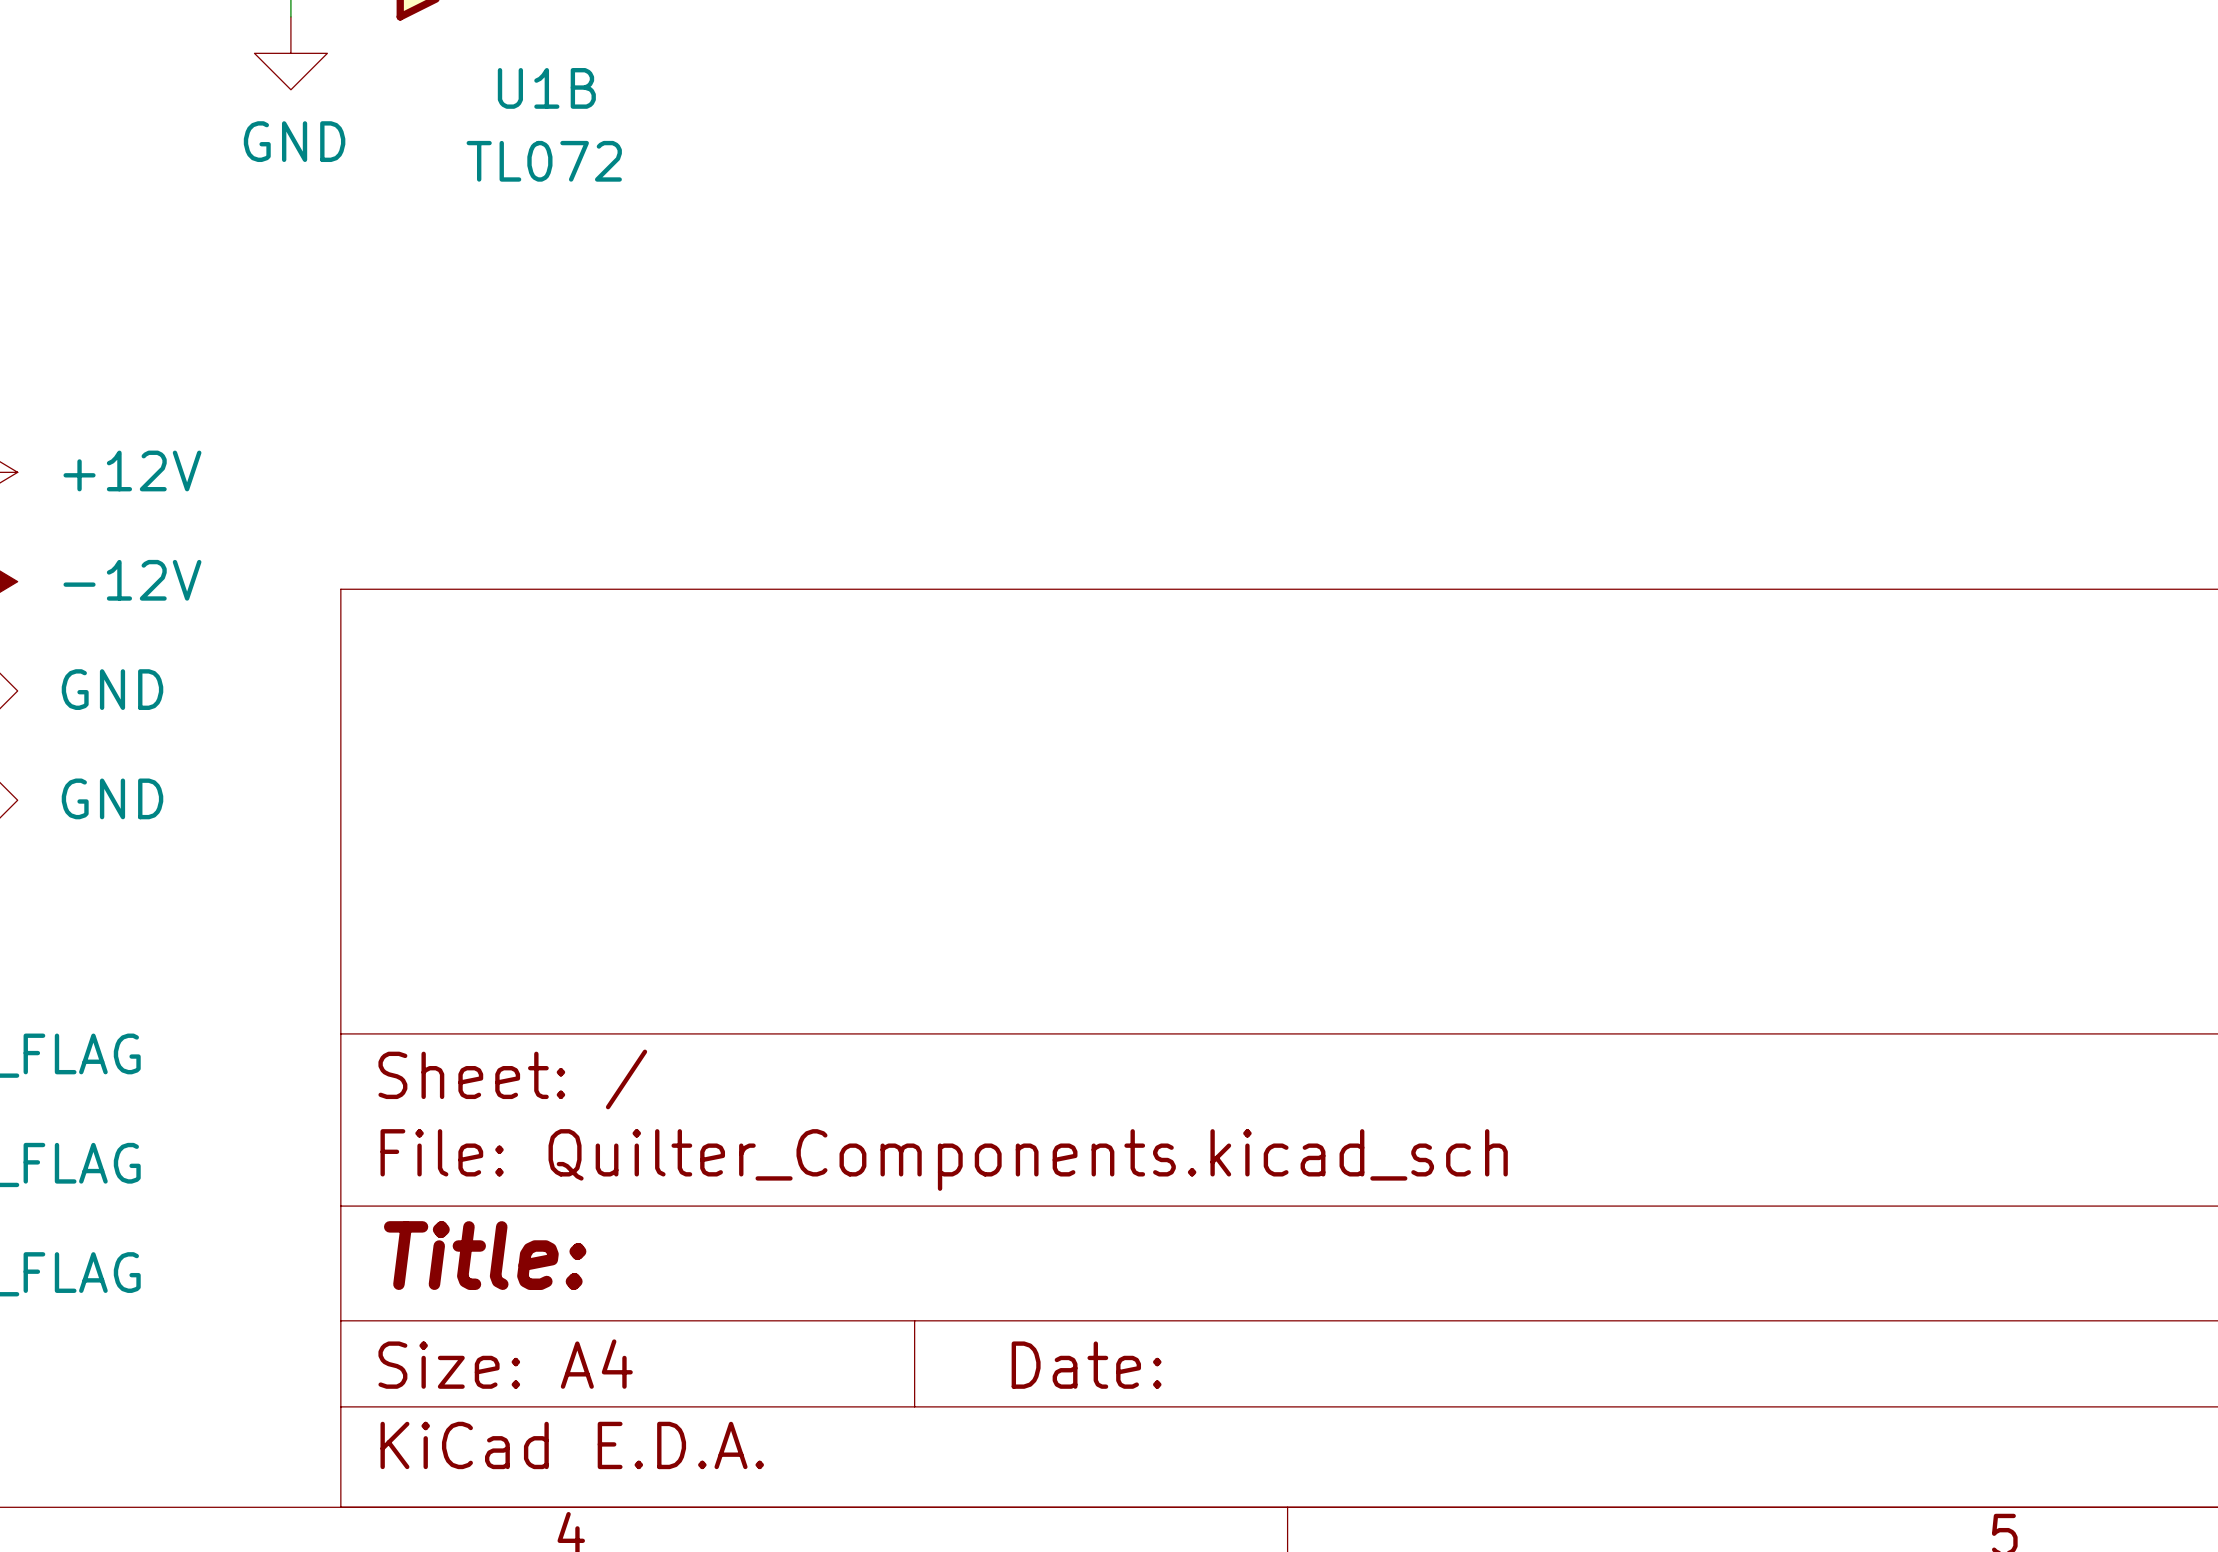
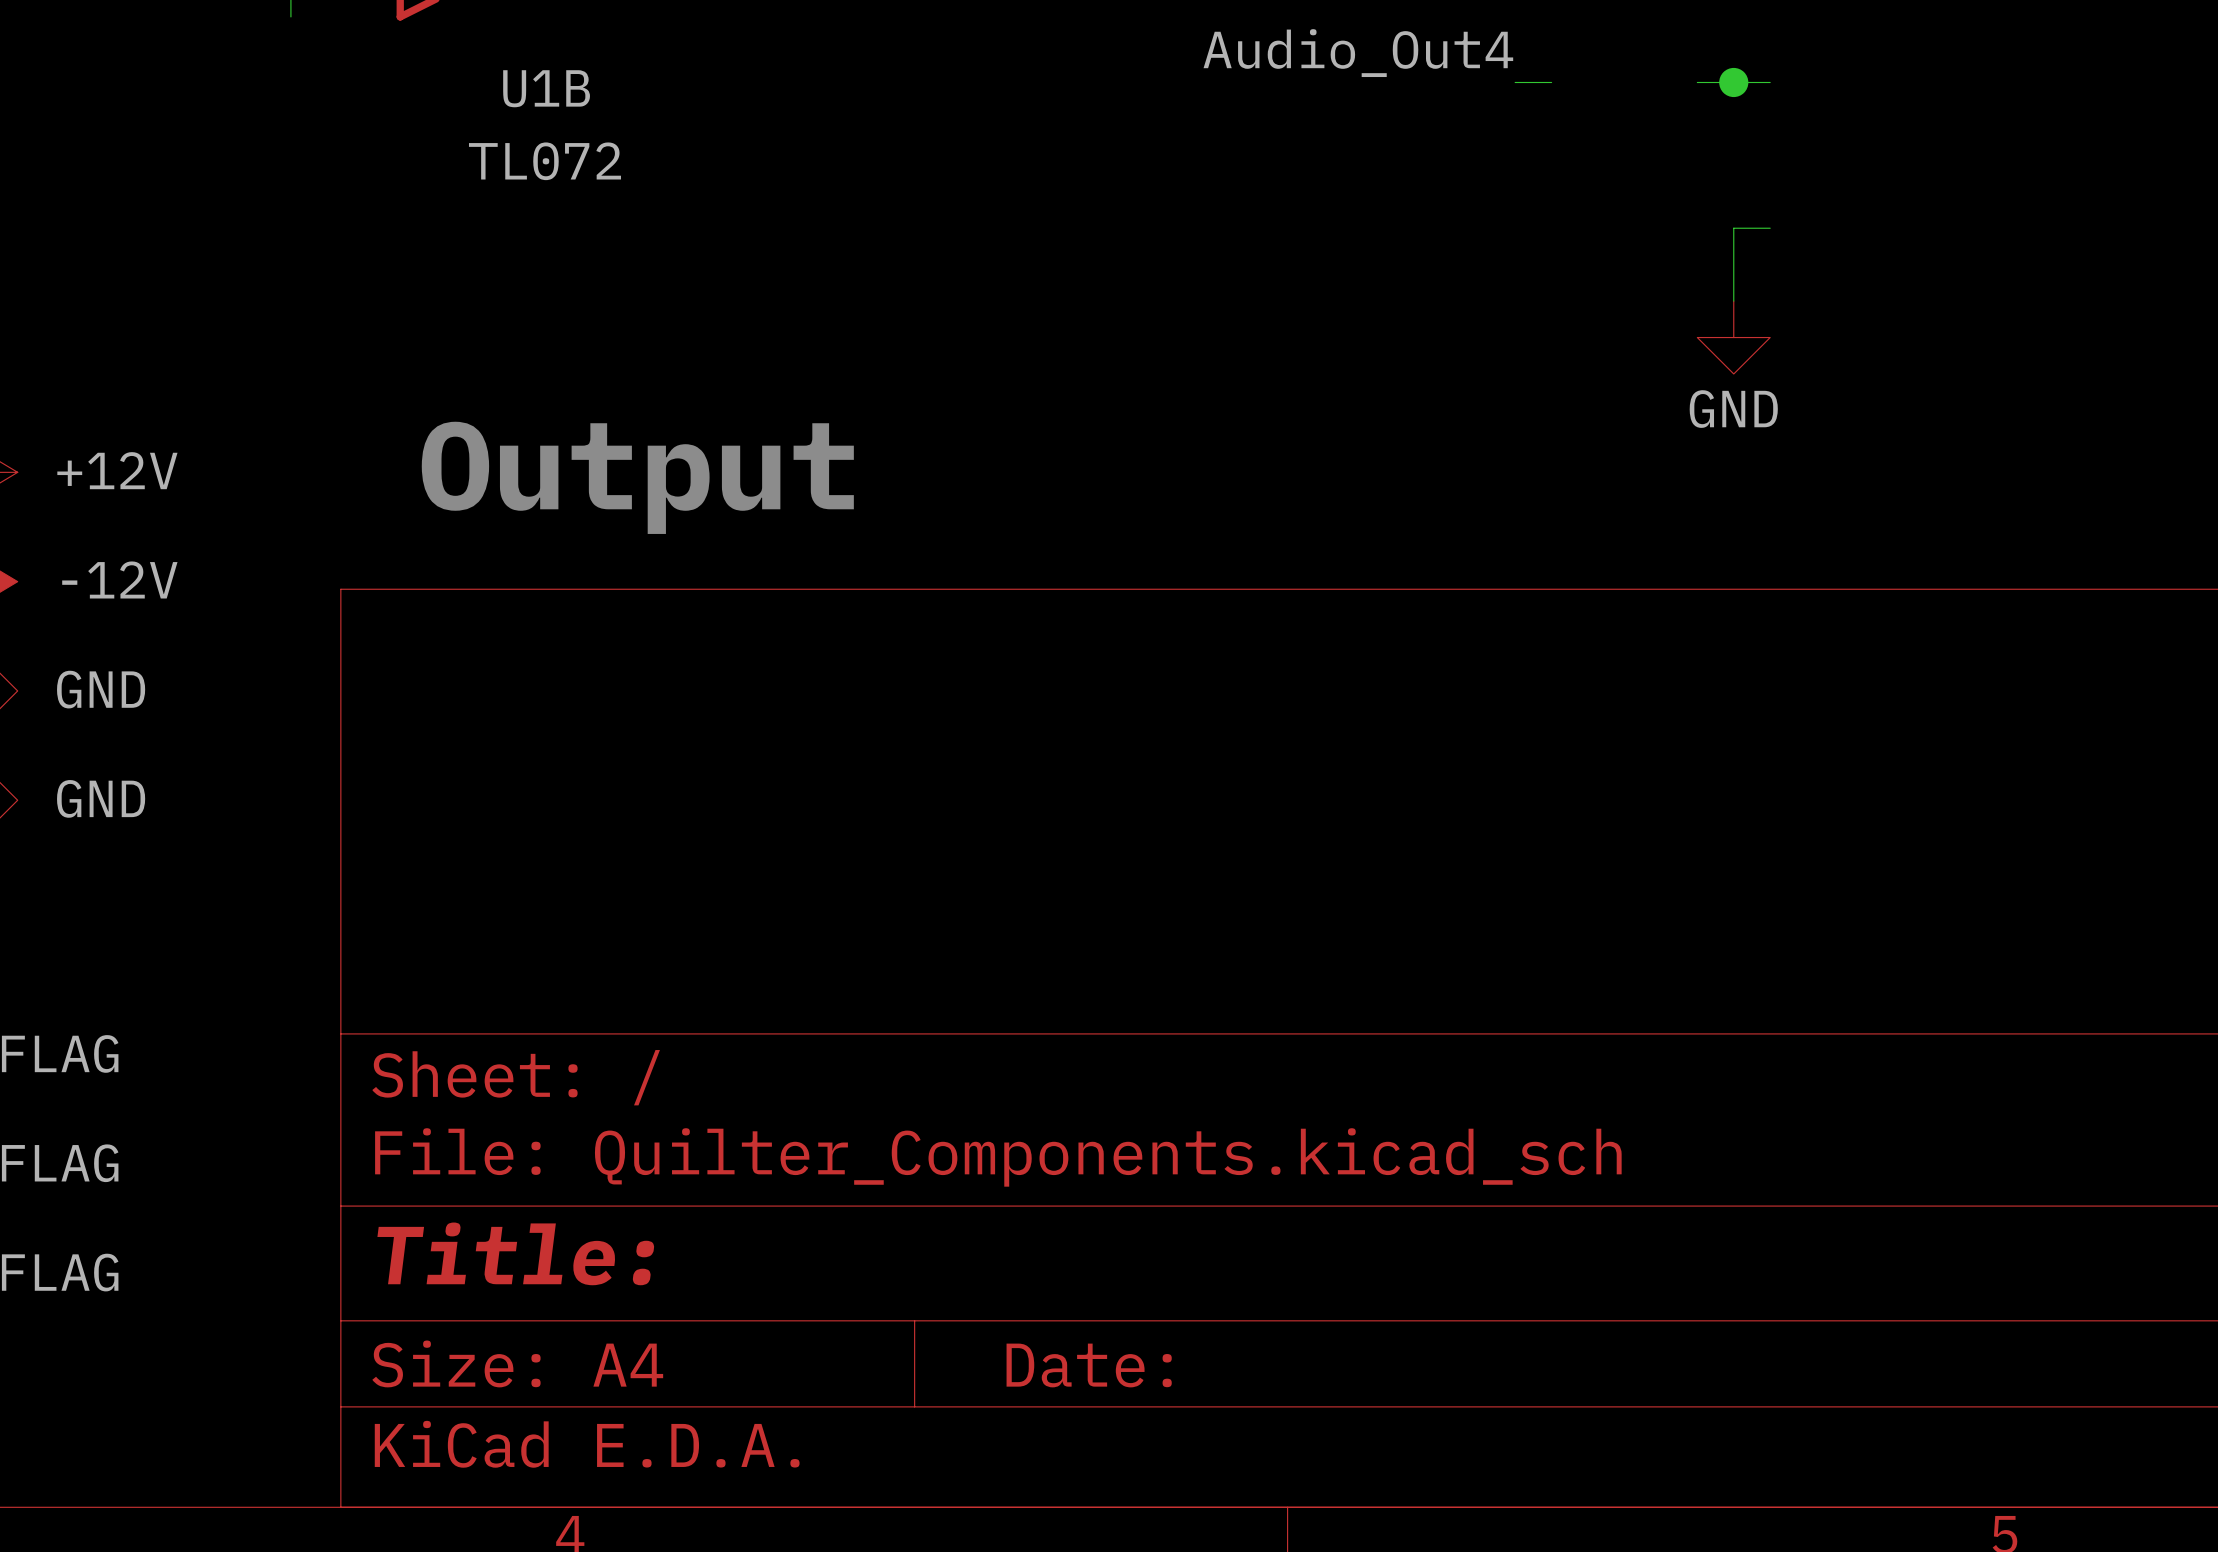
label: none -> Audio_Out4 (1358, 53)
power symbol: GND (290, 53) -> none
wire: none -> (1515, 82) (1551, 82)
wire: none -> (1697, 82) (1770, 82)
junction: none -> (1733, 82)
wire: none -> (1770, 228) (1733, 228) (1733, 301)
power symbol: none -> GND (1733, 337)
text: none -> Output (637, 477)

